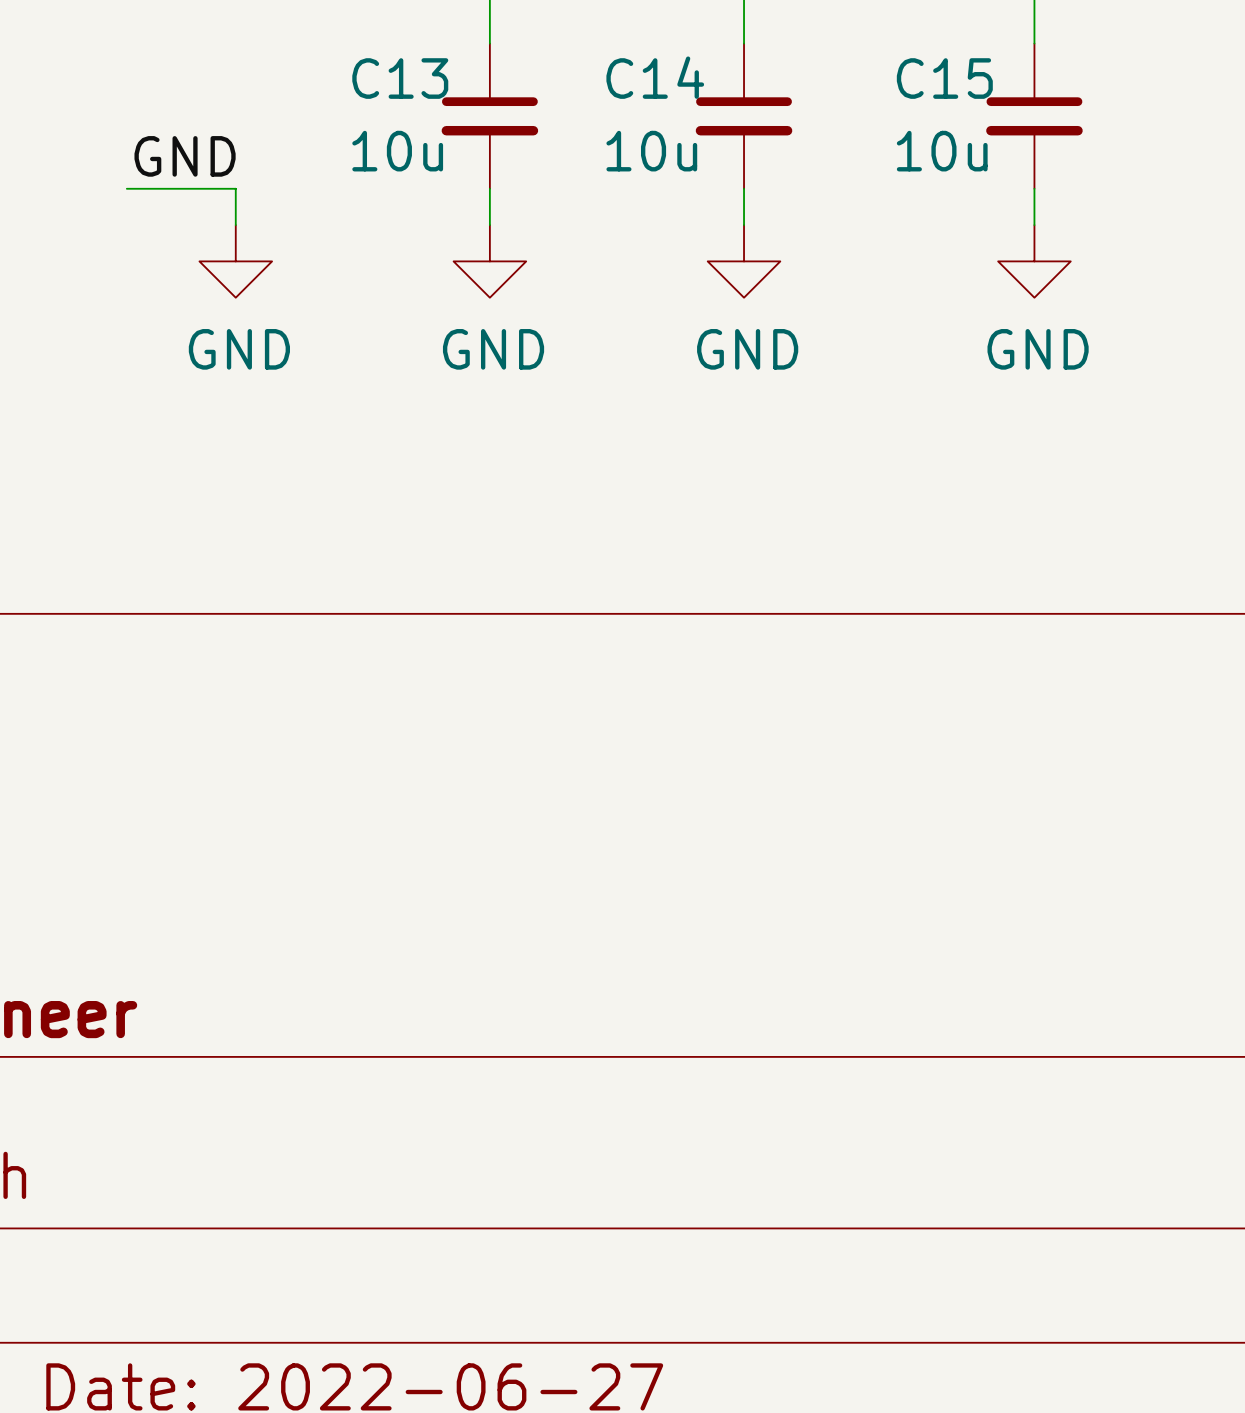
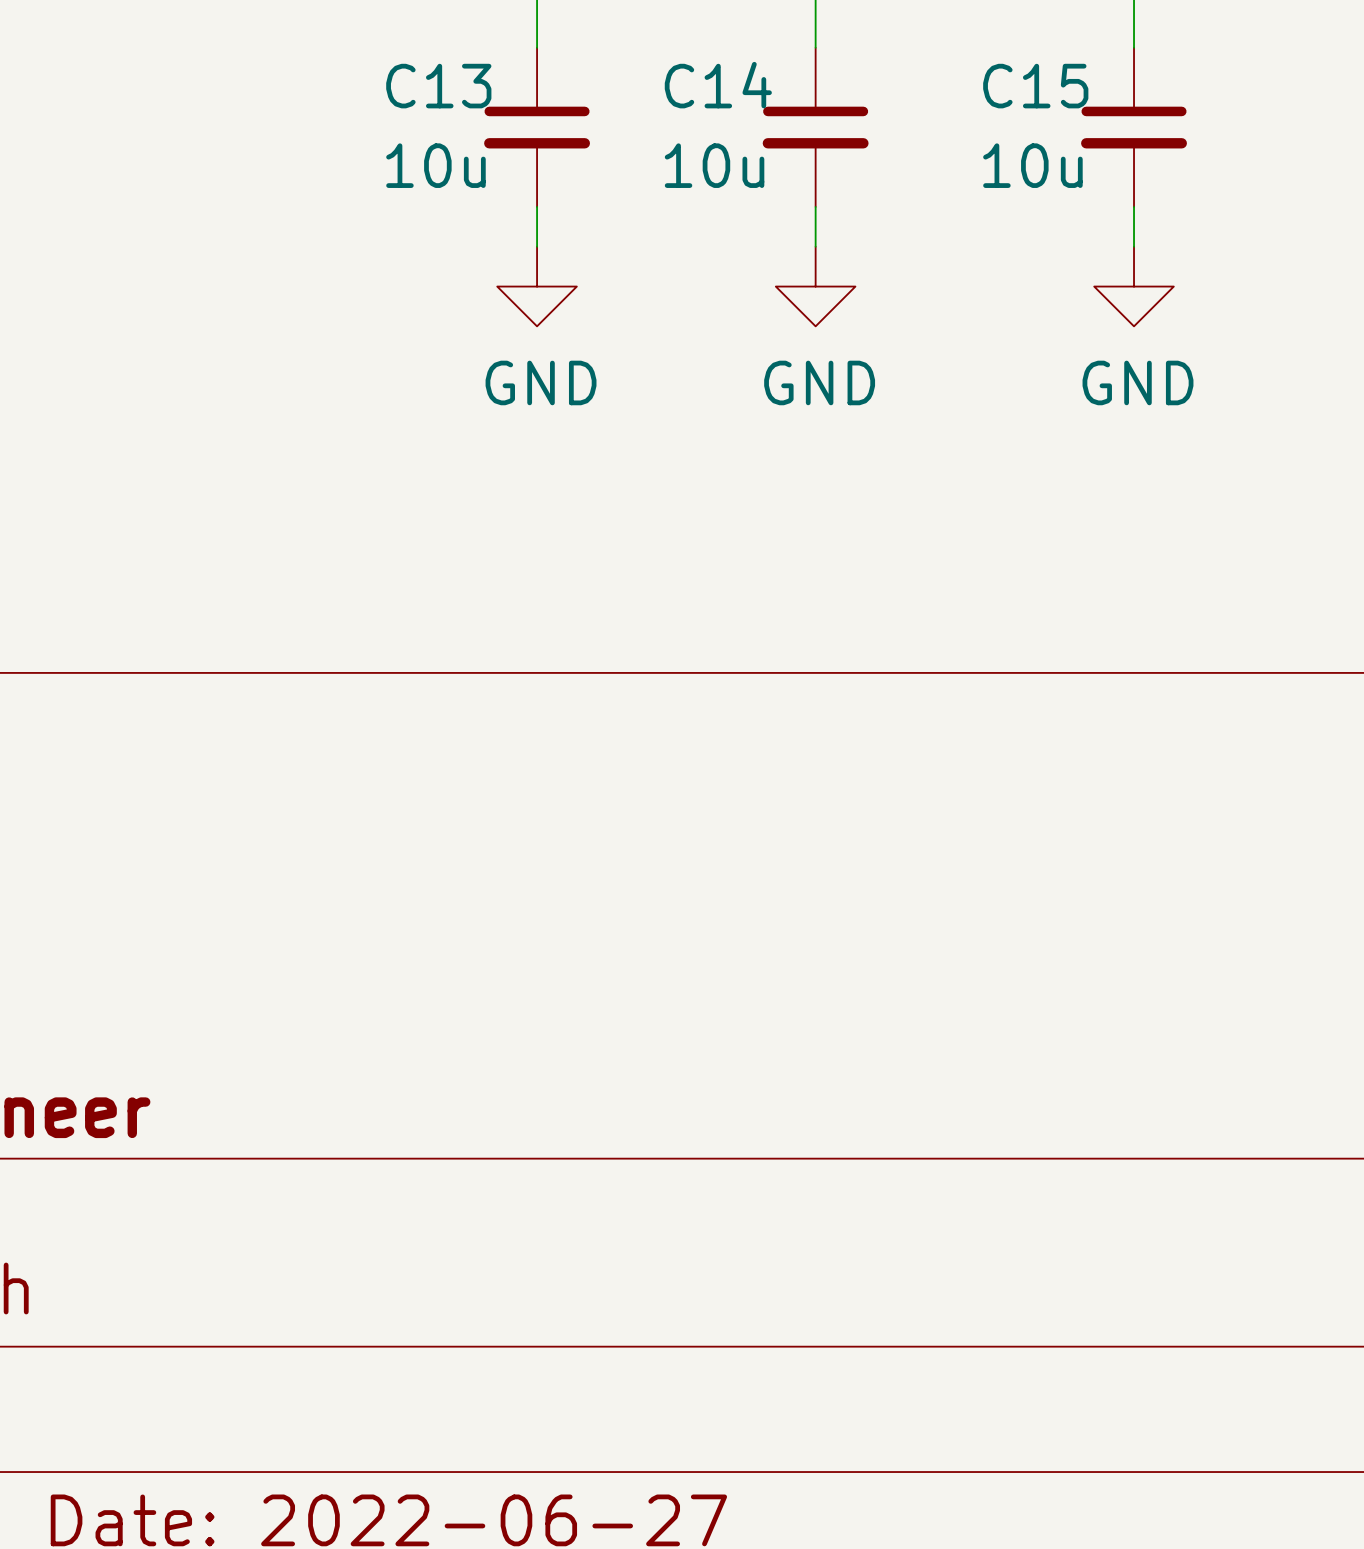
label: GND (185, 156) -> none
wire: (126, 188) (235, 188) (235, 225) -> none
power symbol: GND (235, 261) -> none

